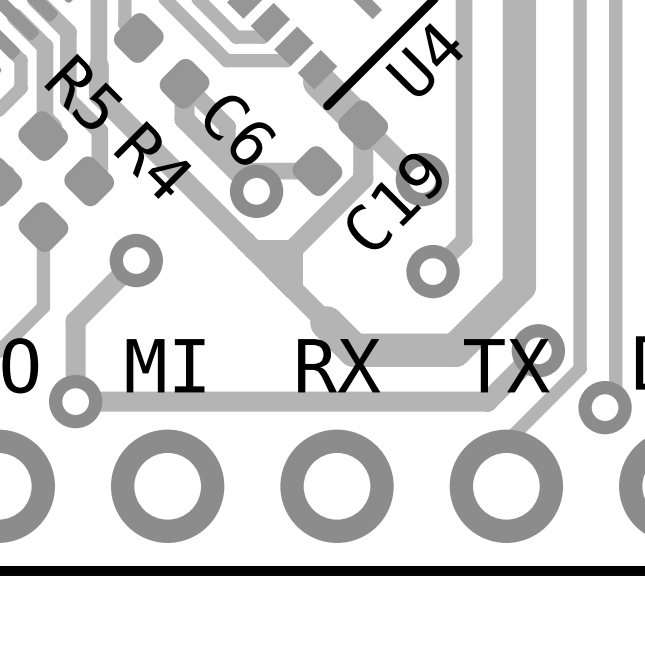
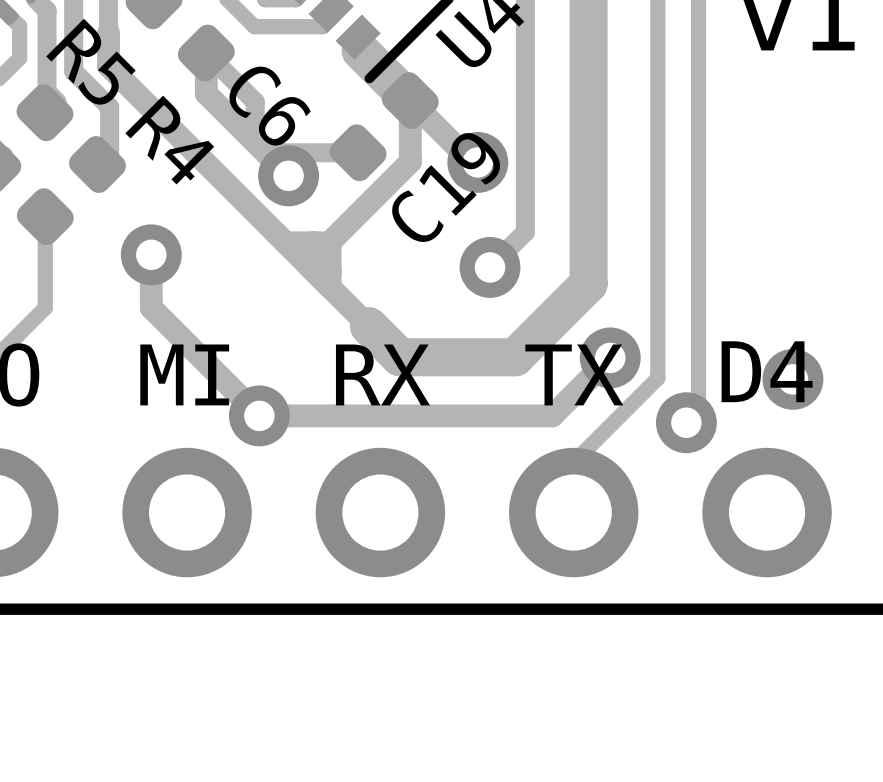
track: (136, 260) (75, 321) (75, 401) (231, 401) -> (151, 254) (151, 307) (259, 415)
via: (75, 401) -> none
via: none -> (259, 415)

